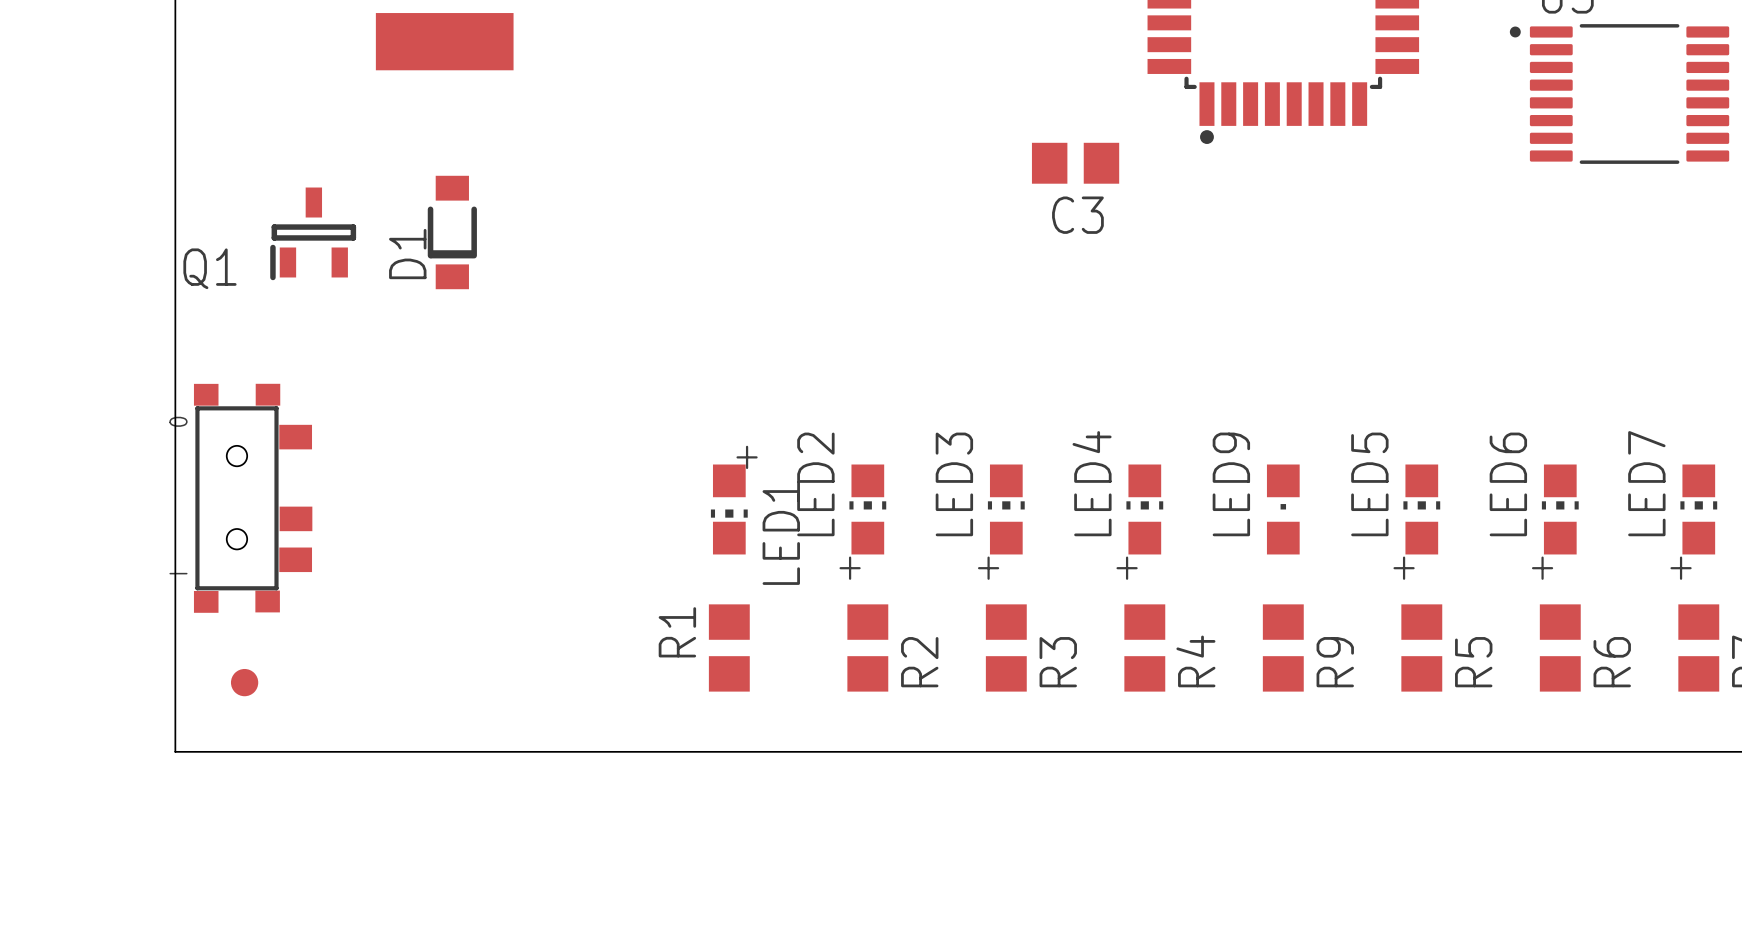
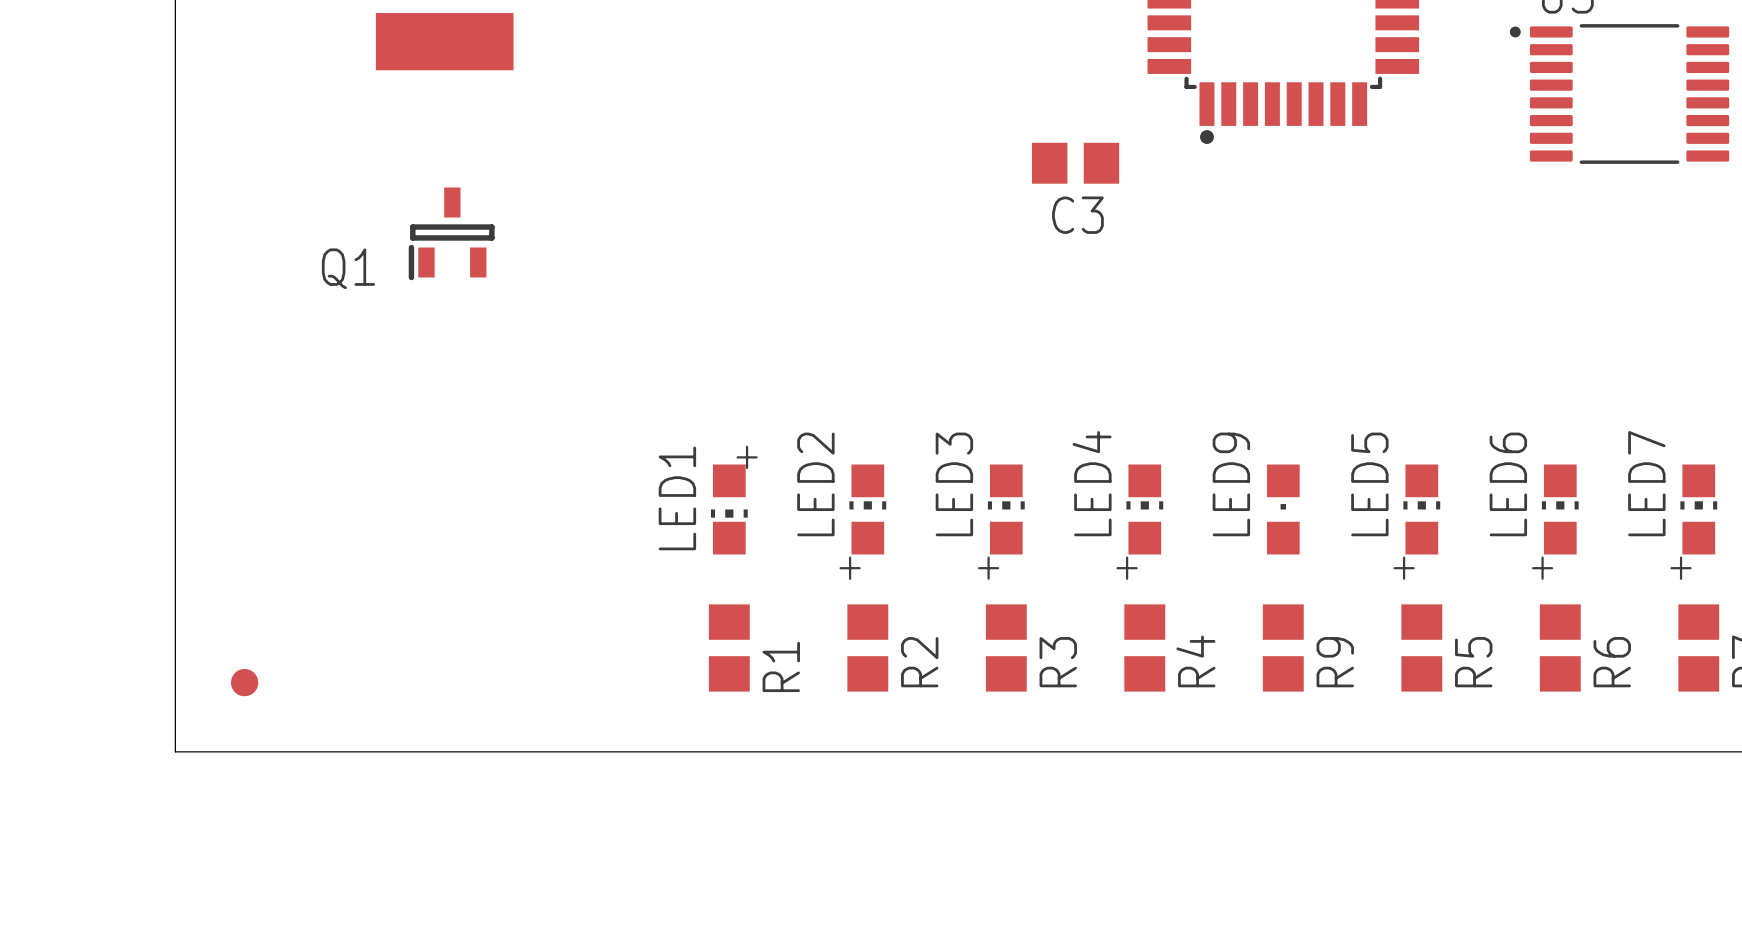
D1: (452, 232) -> none
Q1 position: (313, 233) -> (451, 233)
part: (253, 498) -> none
LED1 name position: LED1 (781, 533) -> LED1 (677, 498)
R1 name position: R1 (677, 632) -> R1 (781, 666)

